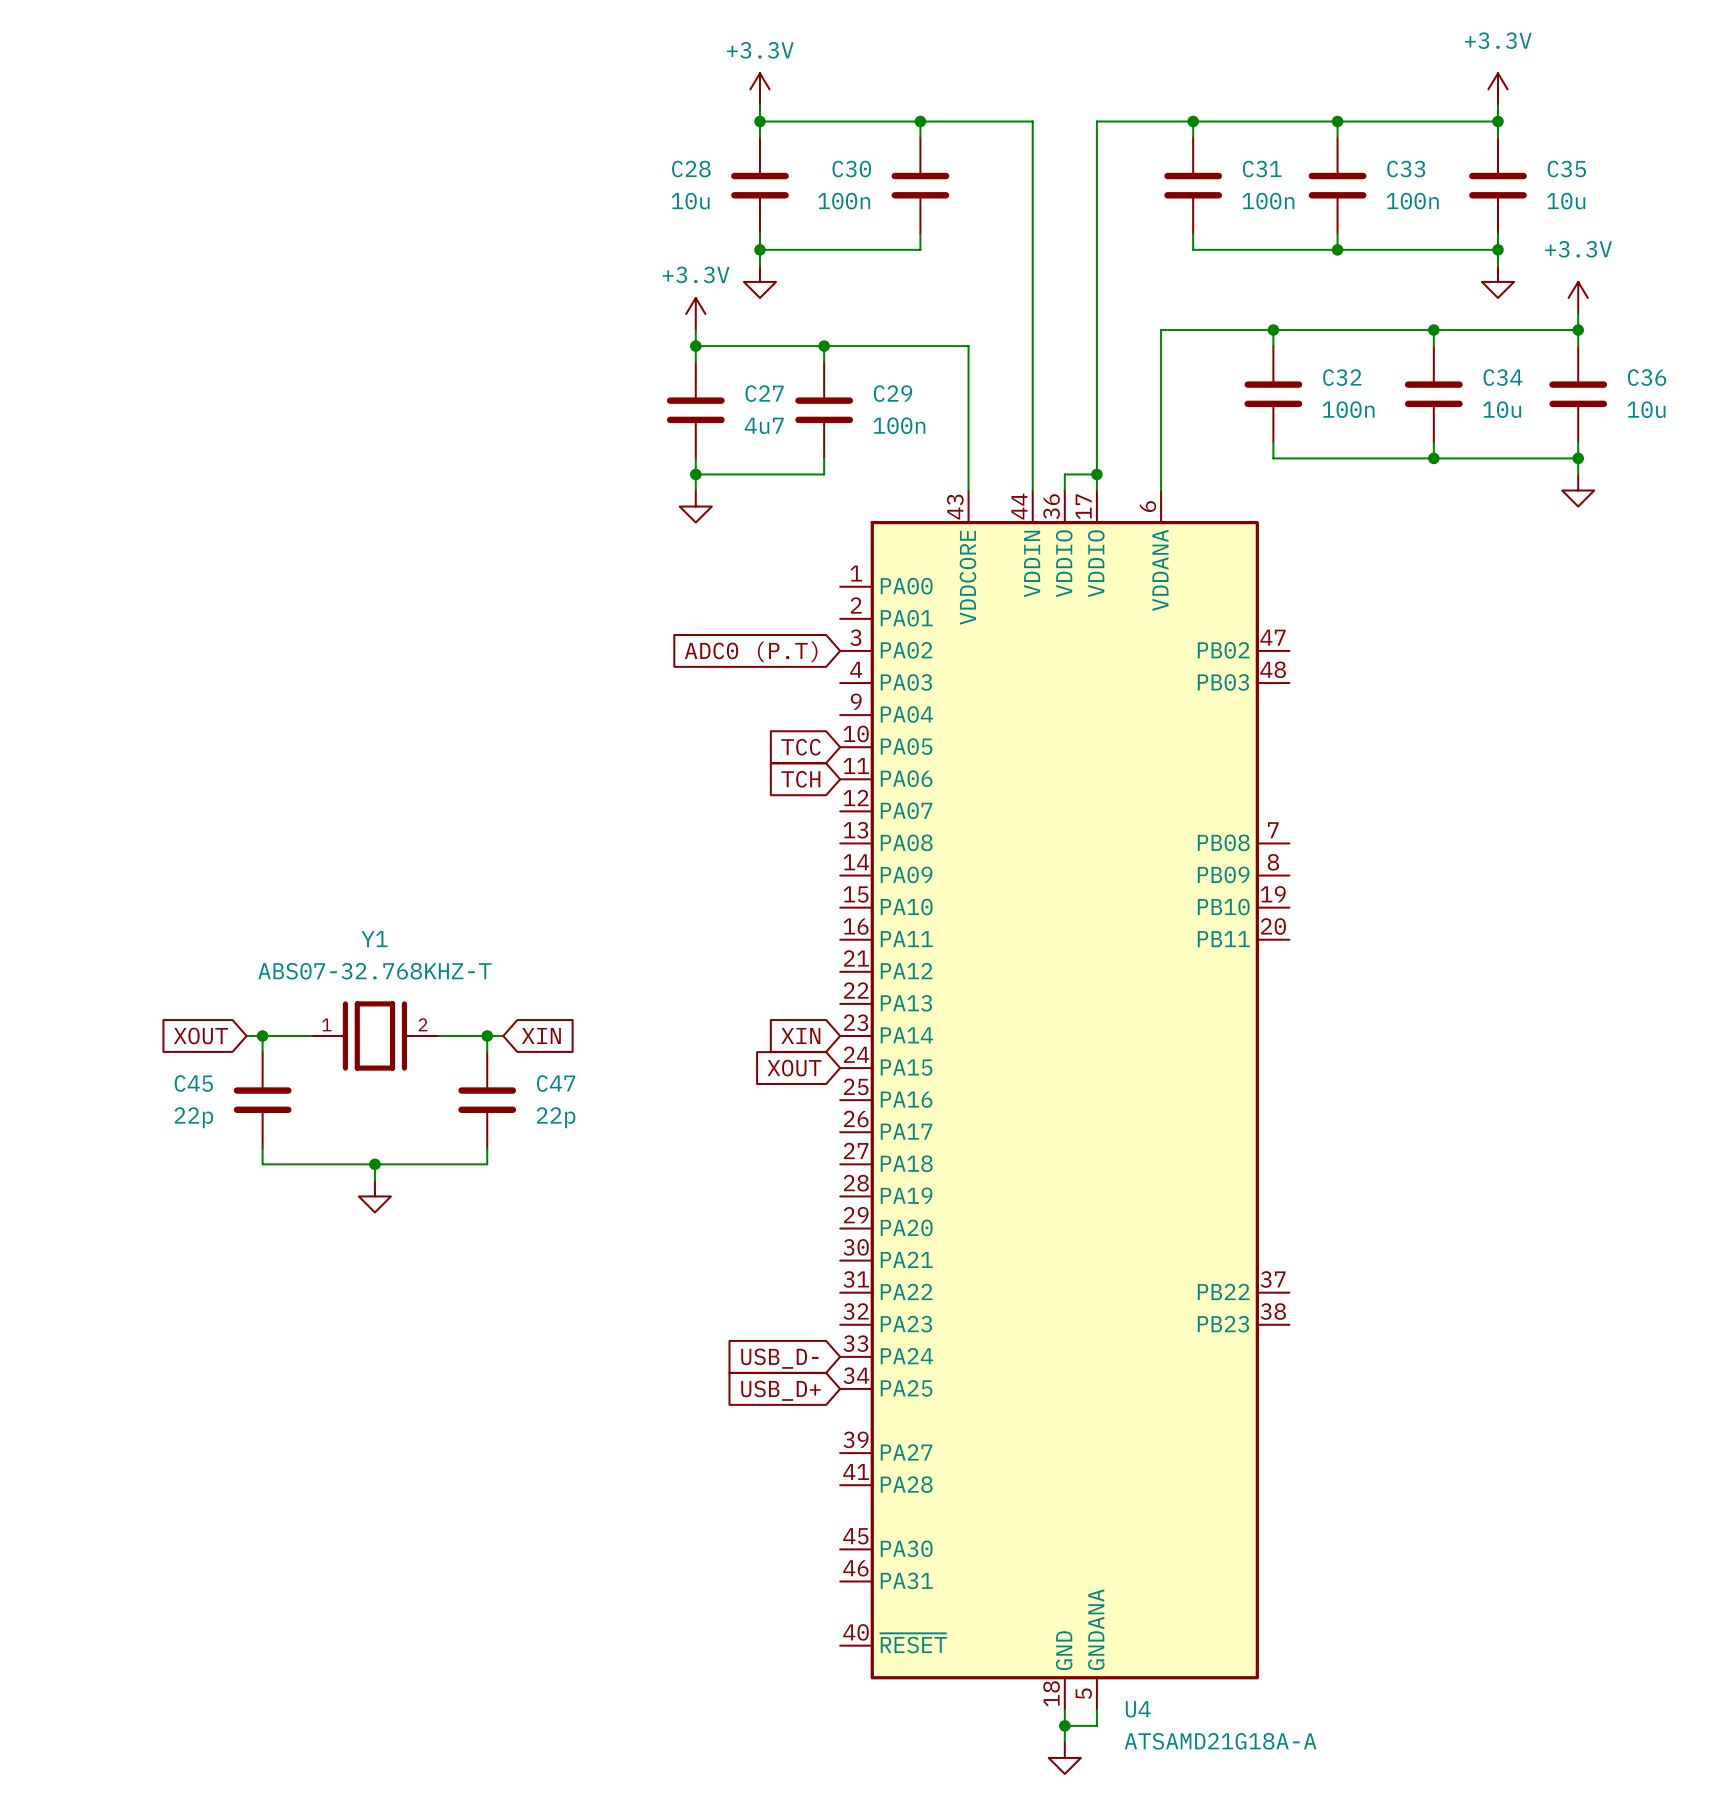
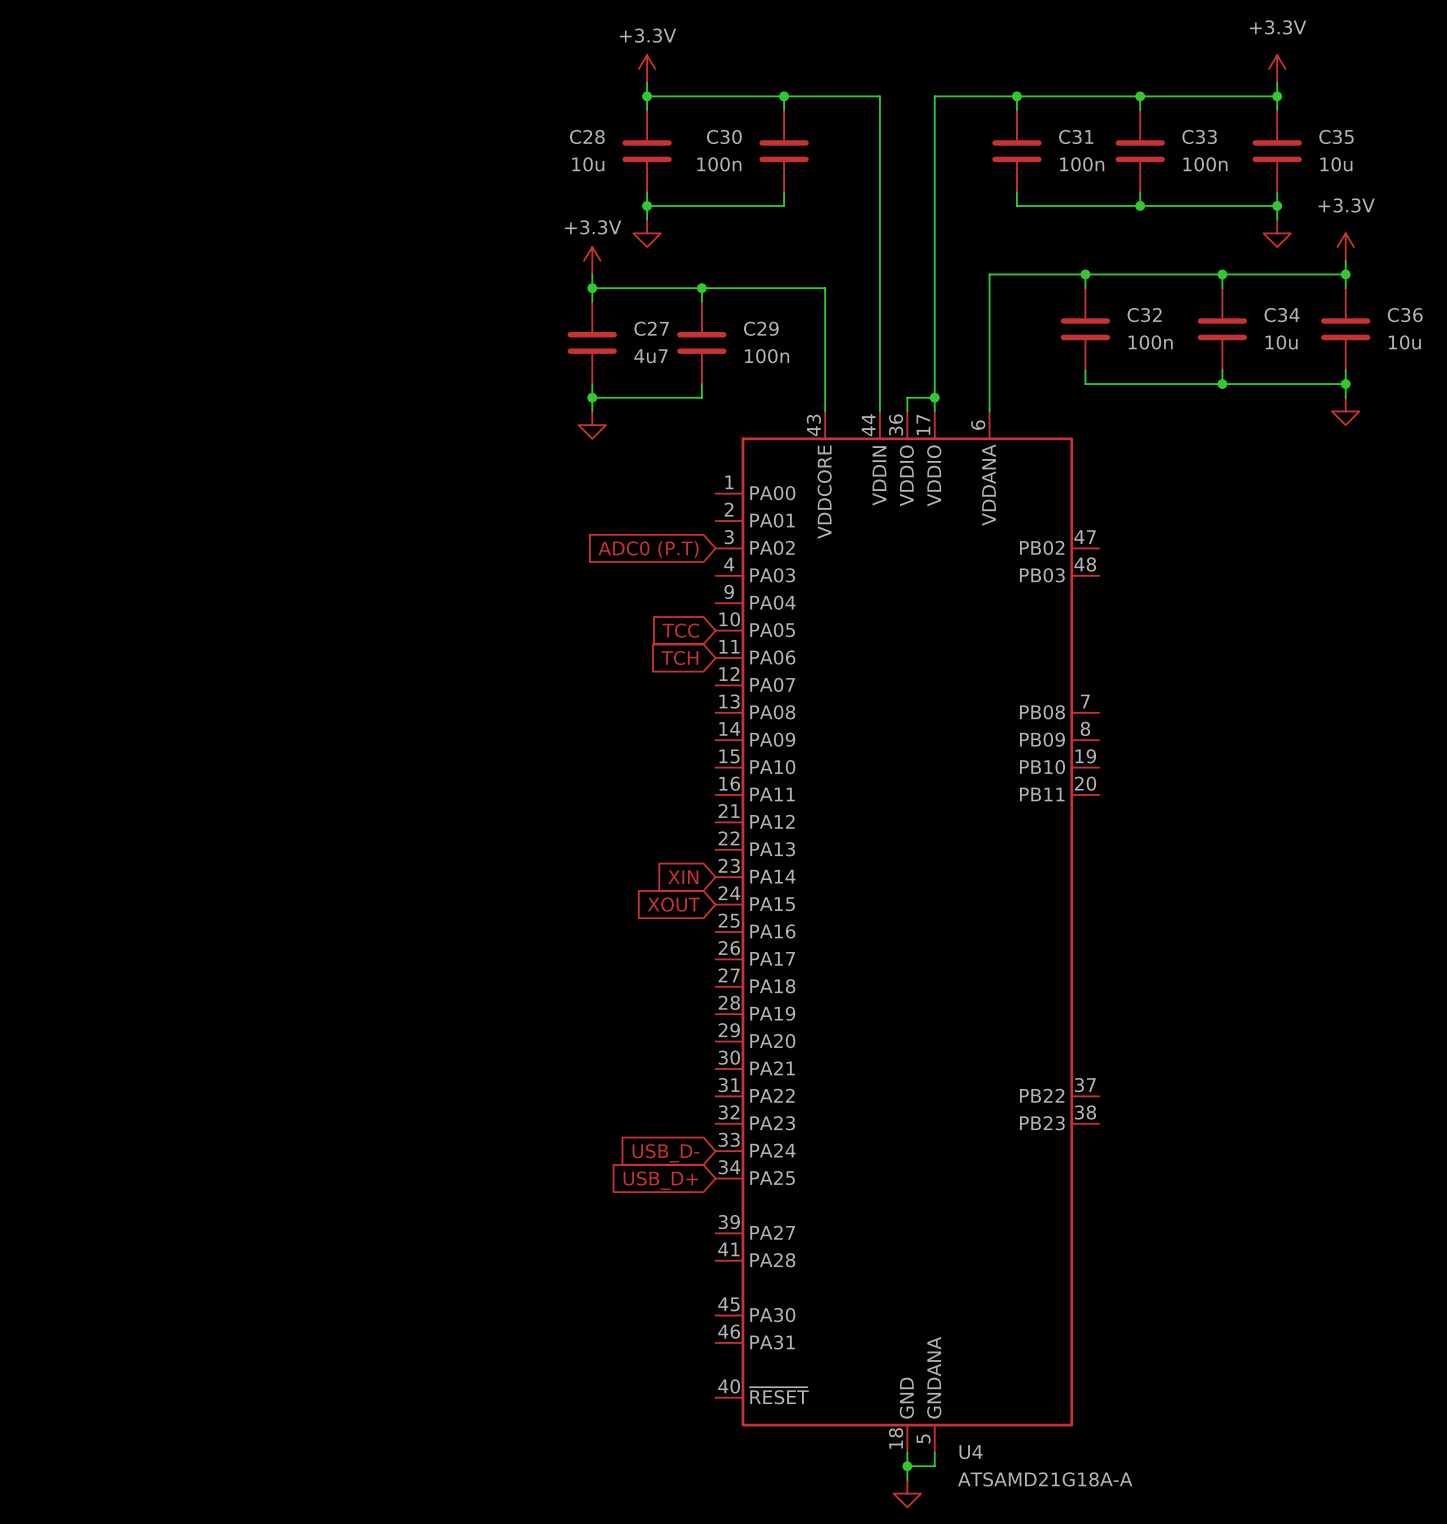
global label: XOUT (200, 1035) -> none
wire: (246, 1035) (310, 1035) -> none
wire: (262, 1035) (262, 1052) -> none
junction: (262, 1035) -> none
Y1: ABS07-32.768KHZ-T (374, 1035) -> none
wire: (439, 1035) (503, 1035) -> none
wire: (487, 1035) (487, 1052) -> none
junction: (487, 1035) -> none
global label: XIN (541, 1035) -> none
C45: 22p (262, 1100) -> none
C47: 22p (487, 1100) -> none
wire: (262, 1148) (262, 1164) (487, 1164) (487, 1148) -> none
wire: (374, 1164) (374, 1180) -> none
junction: (374, 1164) -> none
power symbol: (374, 1196) -> none

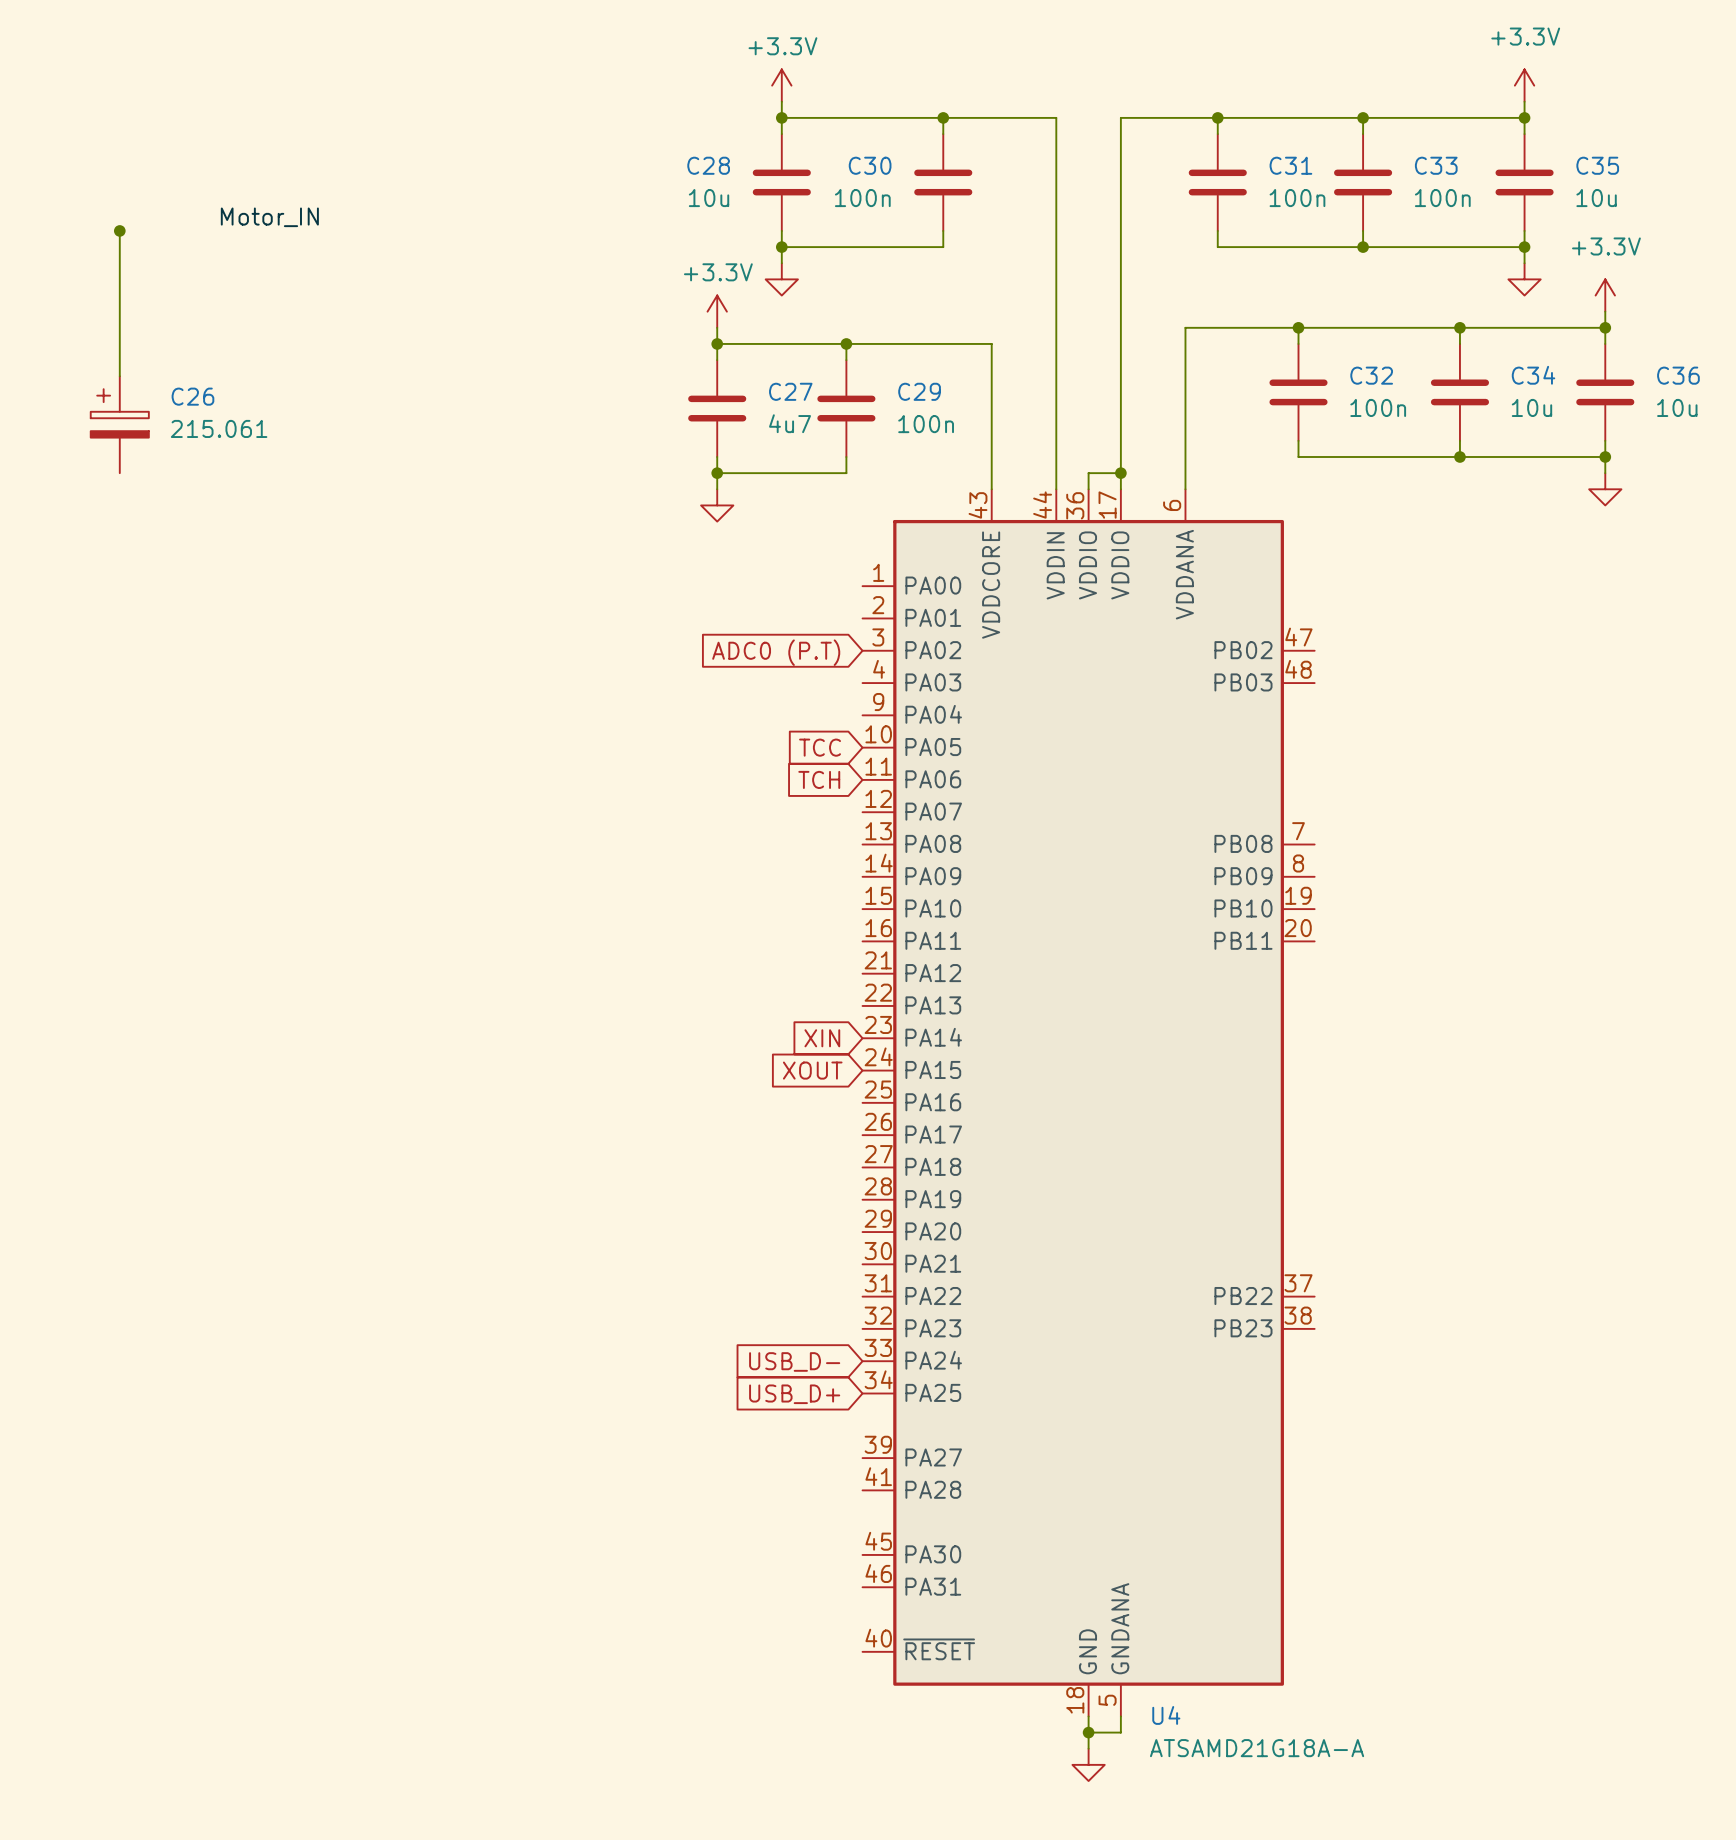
label: none -> Motor_IN (269, 217)
wire: none -> (119, 230) (119, 376)
junction: none -> (119, 230)
C26: none -> 215.061 (119, 424)

